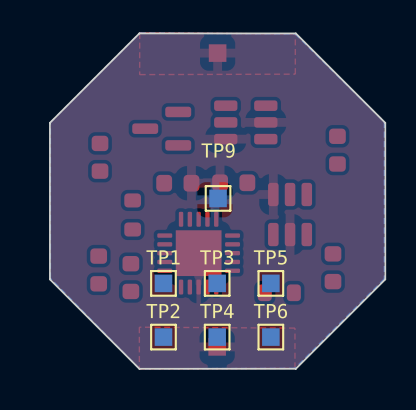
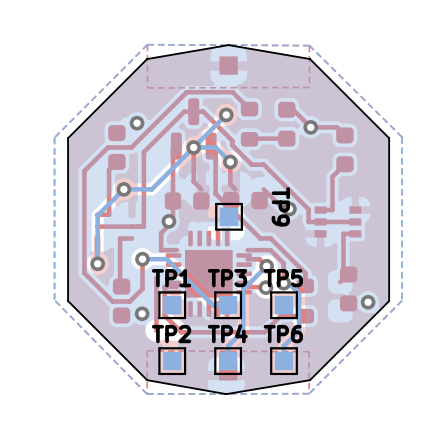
board edge: (295, 33) (385, 122) (385, 279) (295, 368) (139, 368) (49, 279) (49, 122) (139, 33) (295, 33) -> (228, 45) (310, 59) (389, 138) (389, 301) (310, 380) (226, 394) (147, 380) (68, 301) (68, 138) (147, 59) (228, 45)
top track: none -> (249, 109) (232, 92) (186, 92) (131, 147) (107, 147) (84, 171) (84, 273) (112, 301) (129, 301) (142, 288) (142, 259)
top track: none -> (286, 109) (293, 109) (310, 127) (336, 127) (344, 135)
bottom track: none -> (226, 114) (151, 189) (123, 189) (97, 215) (97, 263)
via: none -> (226, 114)
via: none -> (137, 123)
part: none -> (249, 124)
part: none -> (286, 124)
via: none -> (310, 127)
part: (245, 122) -> none
top track: none -> (286, 138) (249, 139)
part rotation: 0° (161, 128) -> 90° clockwise (193, 128)
top track: none -> (176, 146) (172, 149) (172, 221)
top track: none -> (211, 146) (215, 150) (215, 193) (260, 238) (270, 238) (305, 273) (305, 285)
top track: none -> (193, 147) (193, 181) (201, 189)
bottom track: none -> (193, 147) (215, 147) (230, 162)
via: none -> (193, 147)
top track: none -> (116, 161) (109, 169) (109, 214) (97, 214)
top track: none -> (230, 162) (230, 184) (235, 189)
via: none -> (230, 162)
top track: none -> (344, 164) (332, 176) (332, 210) (320, 210)
TP9 name rotation: 0° (218, 150) -> 90° clockwise (280, 206)
TP9 name position: TP9 (218, 150) -> TP9 (280, 206)
part position: (337, 150) -> (344, 149)
part position: (100, 157) -> (116, 147)
via: none -> (123, 189)
top track: none -> (263, 189) (283, 209) (289, 209)
via: none -> (289, 209)
via: none -> (168, 221)
top track: none -> (172, 221) (161, 233) (161, 250) (177, 250)
part: none -> (337, 221)
top track: none -> (355, 221) (308, 221) (308, 209) (263, 164) (251, 164) (232, 145) (232, 140) (203, 111) (184, 111) (143, 152) (143, 226) (97, 226)
part: (132, 214) -> none
part: (290, 214) -> none
top track: none -> (355, 233) (343, 233) (343, 278) (340, 281)
top track: none -> (131, 238) (120, 238) (121, 286)
top track: none -> (247, 250) (270, 250) (283, 263) (283, 283)
bottom track: none -> (142, 259) (166, 259) (213, 305) (228, 305)
via: none -> (142, 259)
top track: none -> (247, 259) (259, 259) (266, 266)
via: none -> (97, 263)
bottom track: none -> (266, 266) (243, 289) (243, 330) (228, 346) (228, 361)
via: none -> (266, 266)
top track: none -> (156, 277) (156, 330)
bottom track: none -> (283, 283) (288, 283) (299, 293) (299, 330) (284, 346) (284, 361)
via: none -> (283, 283)
top track: none -> (177, 286) (164, 287) (164, 315) (181, 332) (264, 332) (280, 316) (305, 316)
top track: none -> (247, 286) (265, 287)
via: none -> (265, 287)
part: (98, 269) -> none
part: (130, 277) -> none
part: none -> (121, 301)
via: none -> (368, 302)
via: none -> (142, 313)
part rotation: 0° (279, 292) -> 90° clockwise (305, 301)

